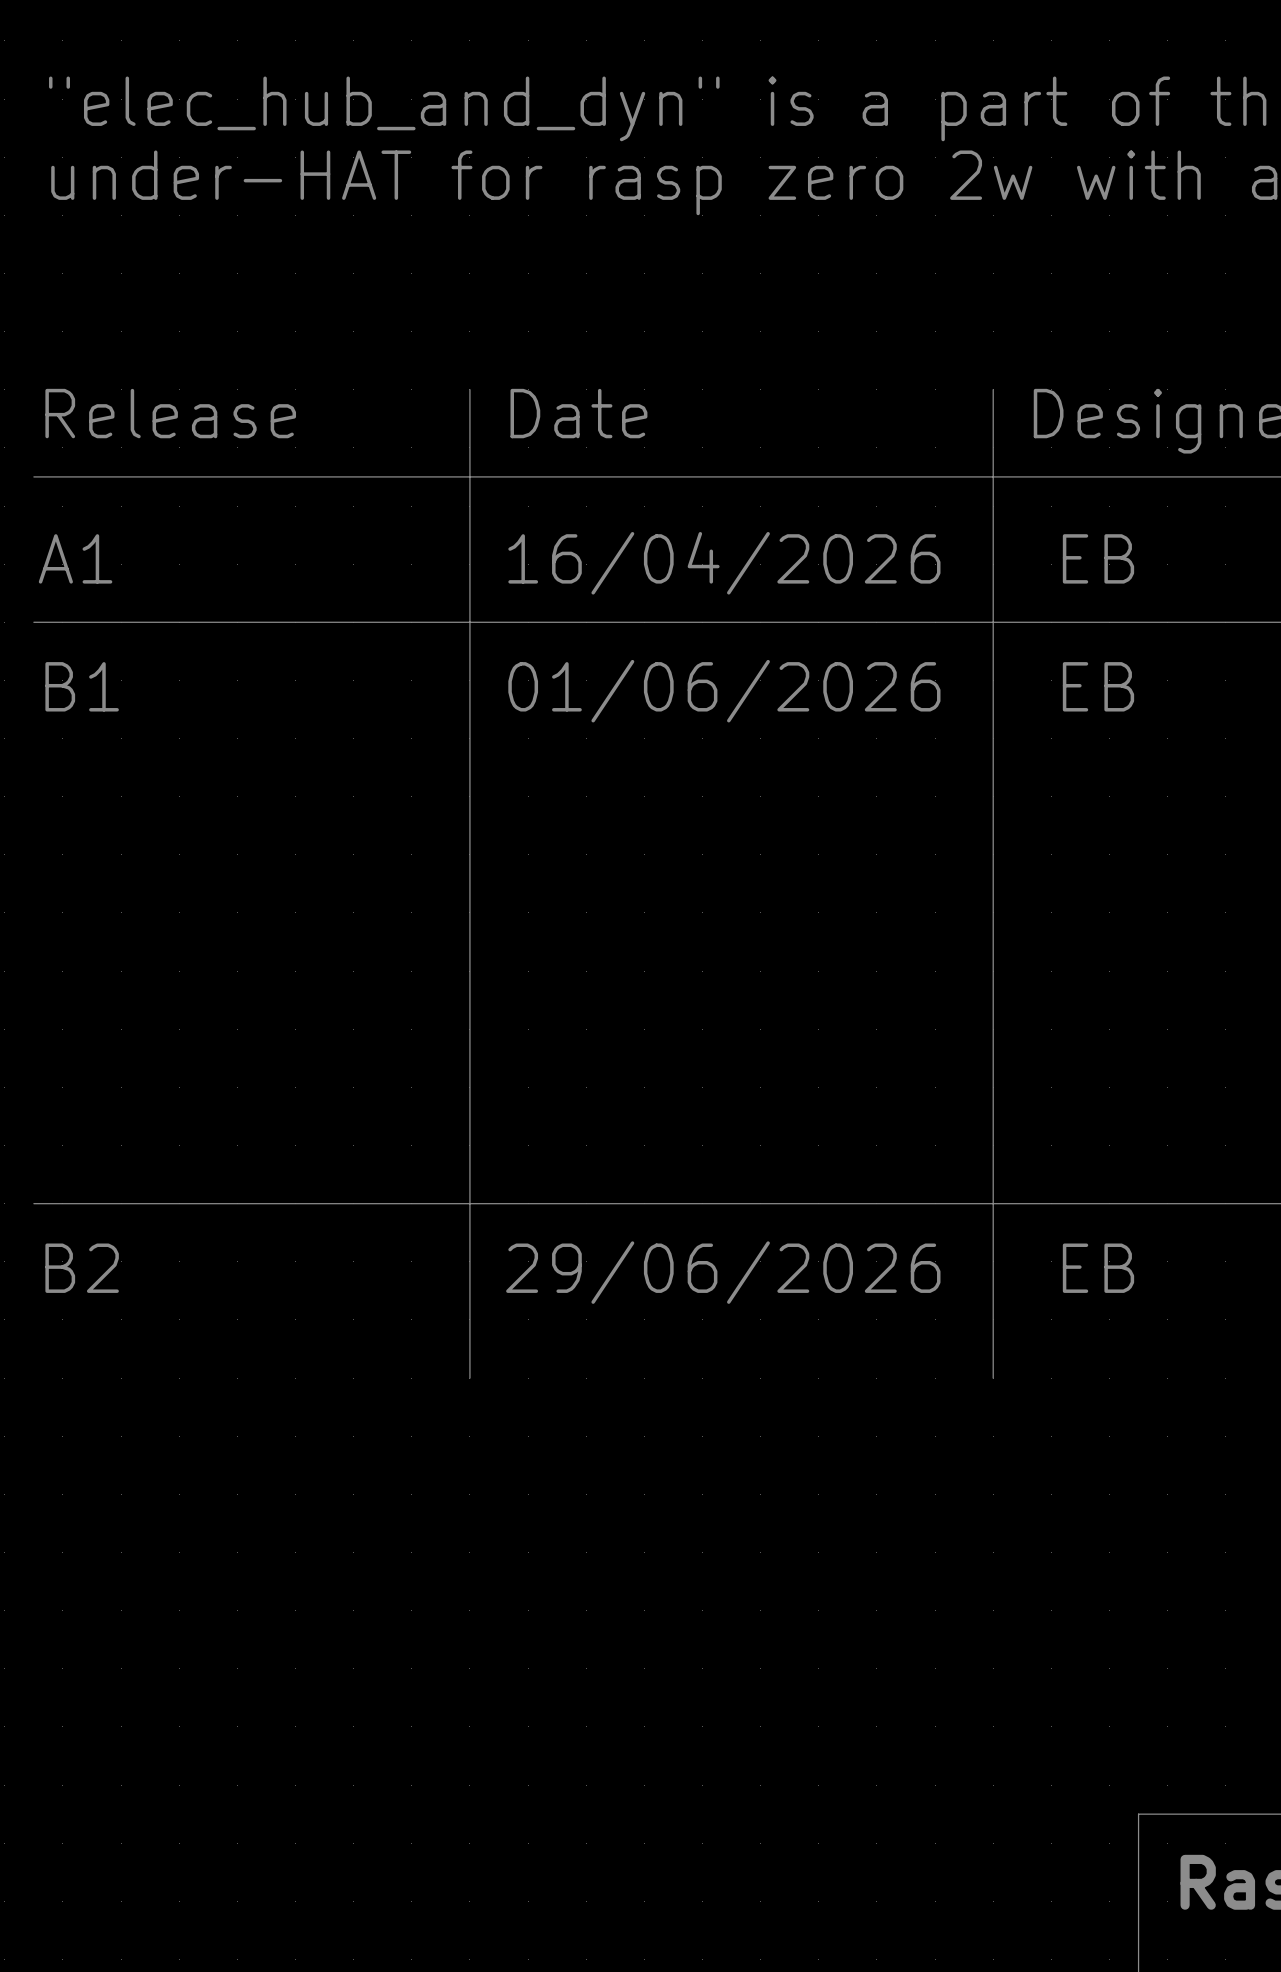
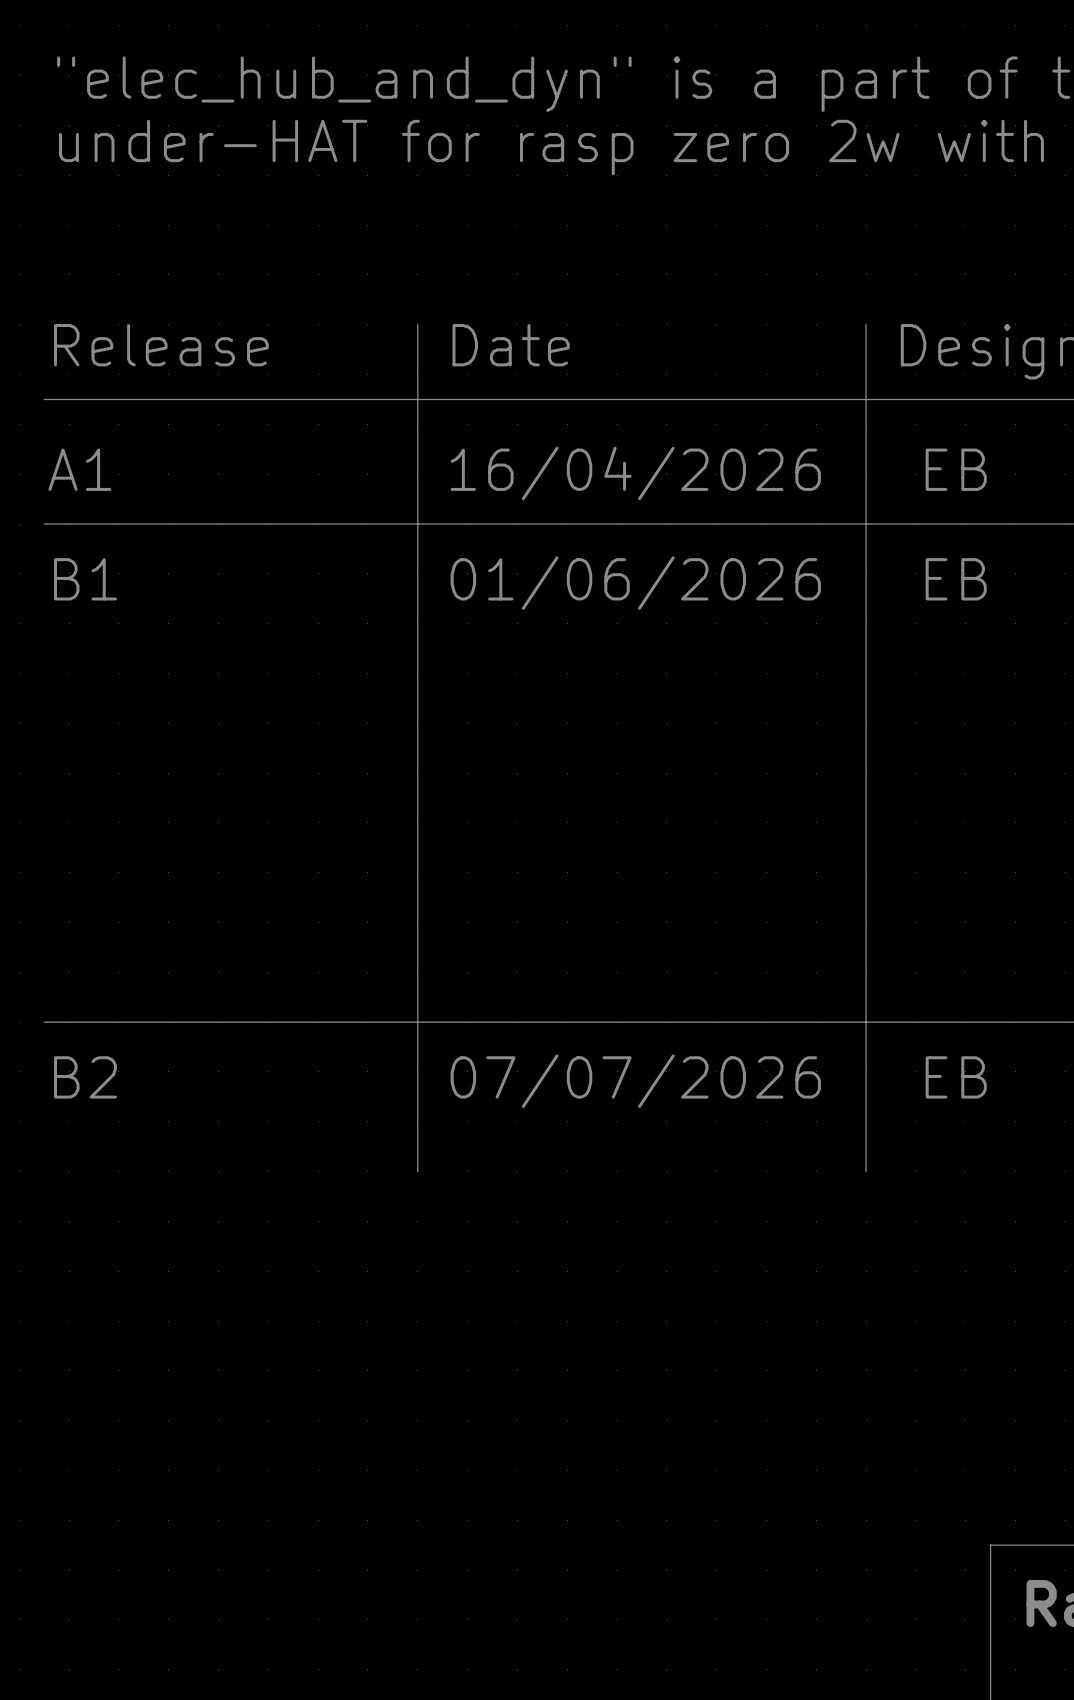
text: 29/06/2026 (723, 1272) -> 07/07/2026 (635, 1081)

